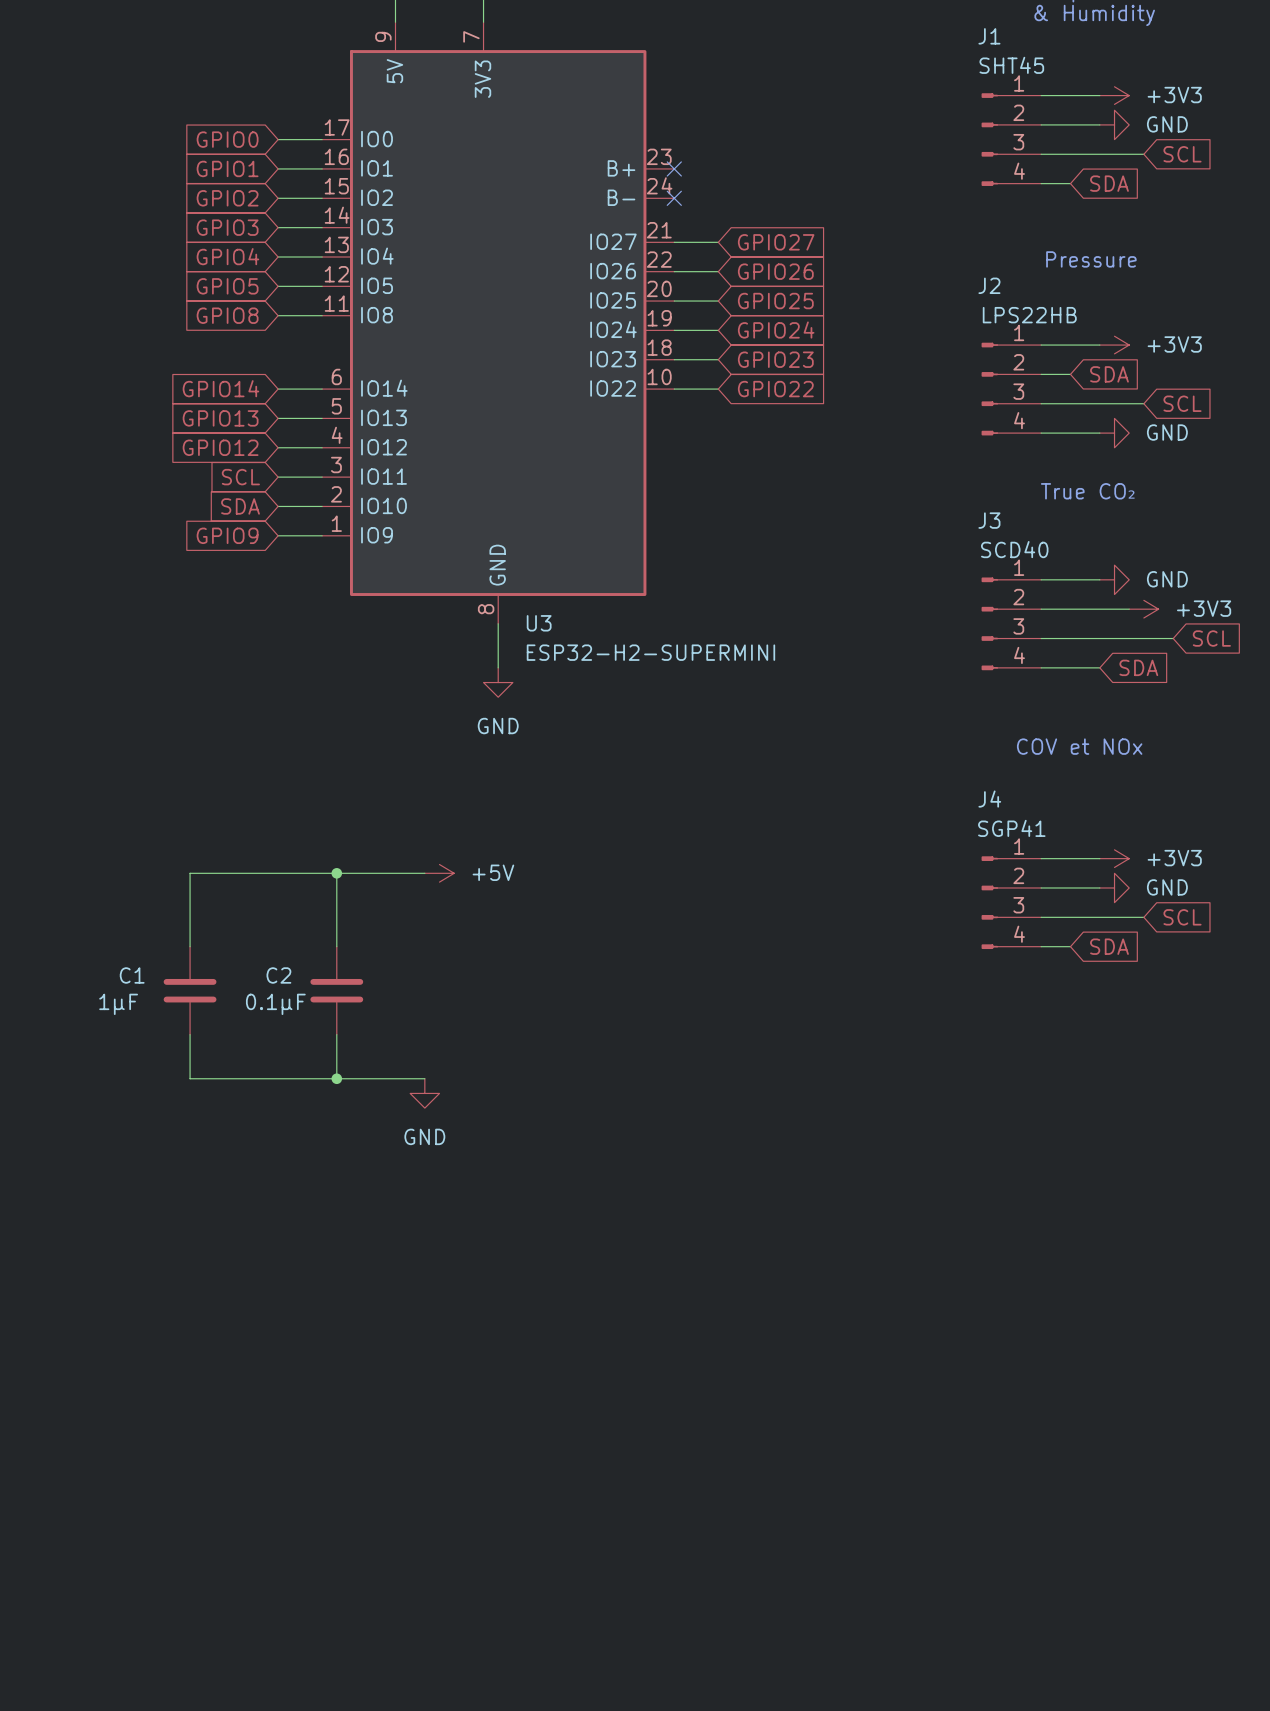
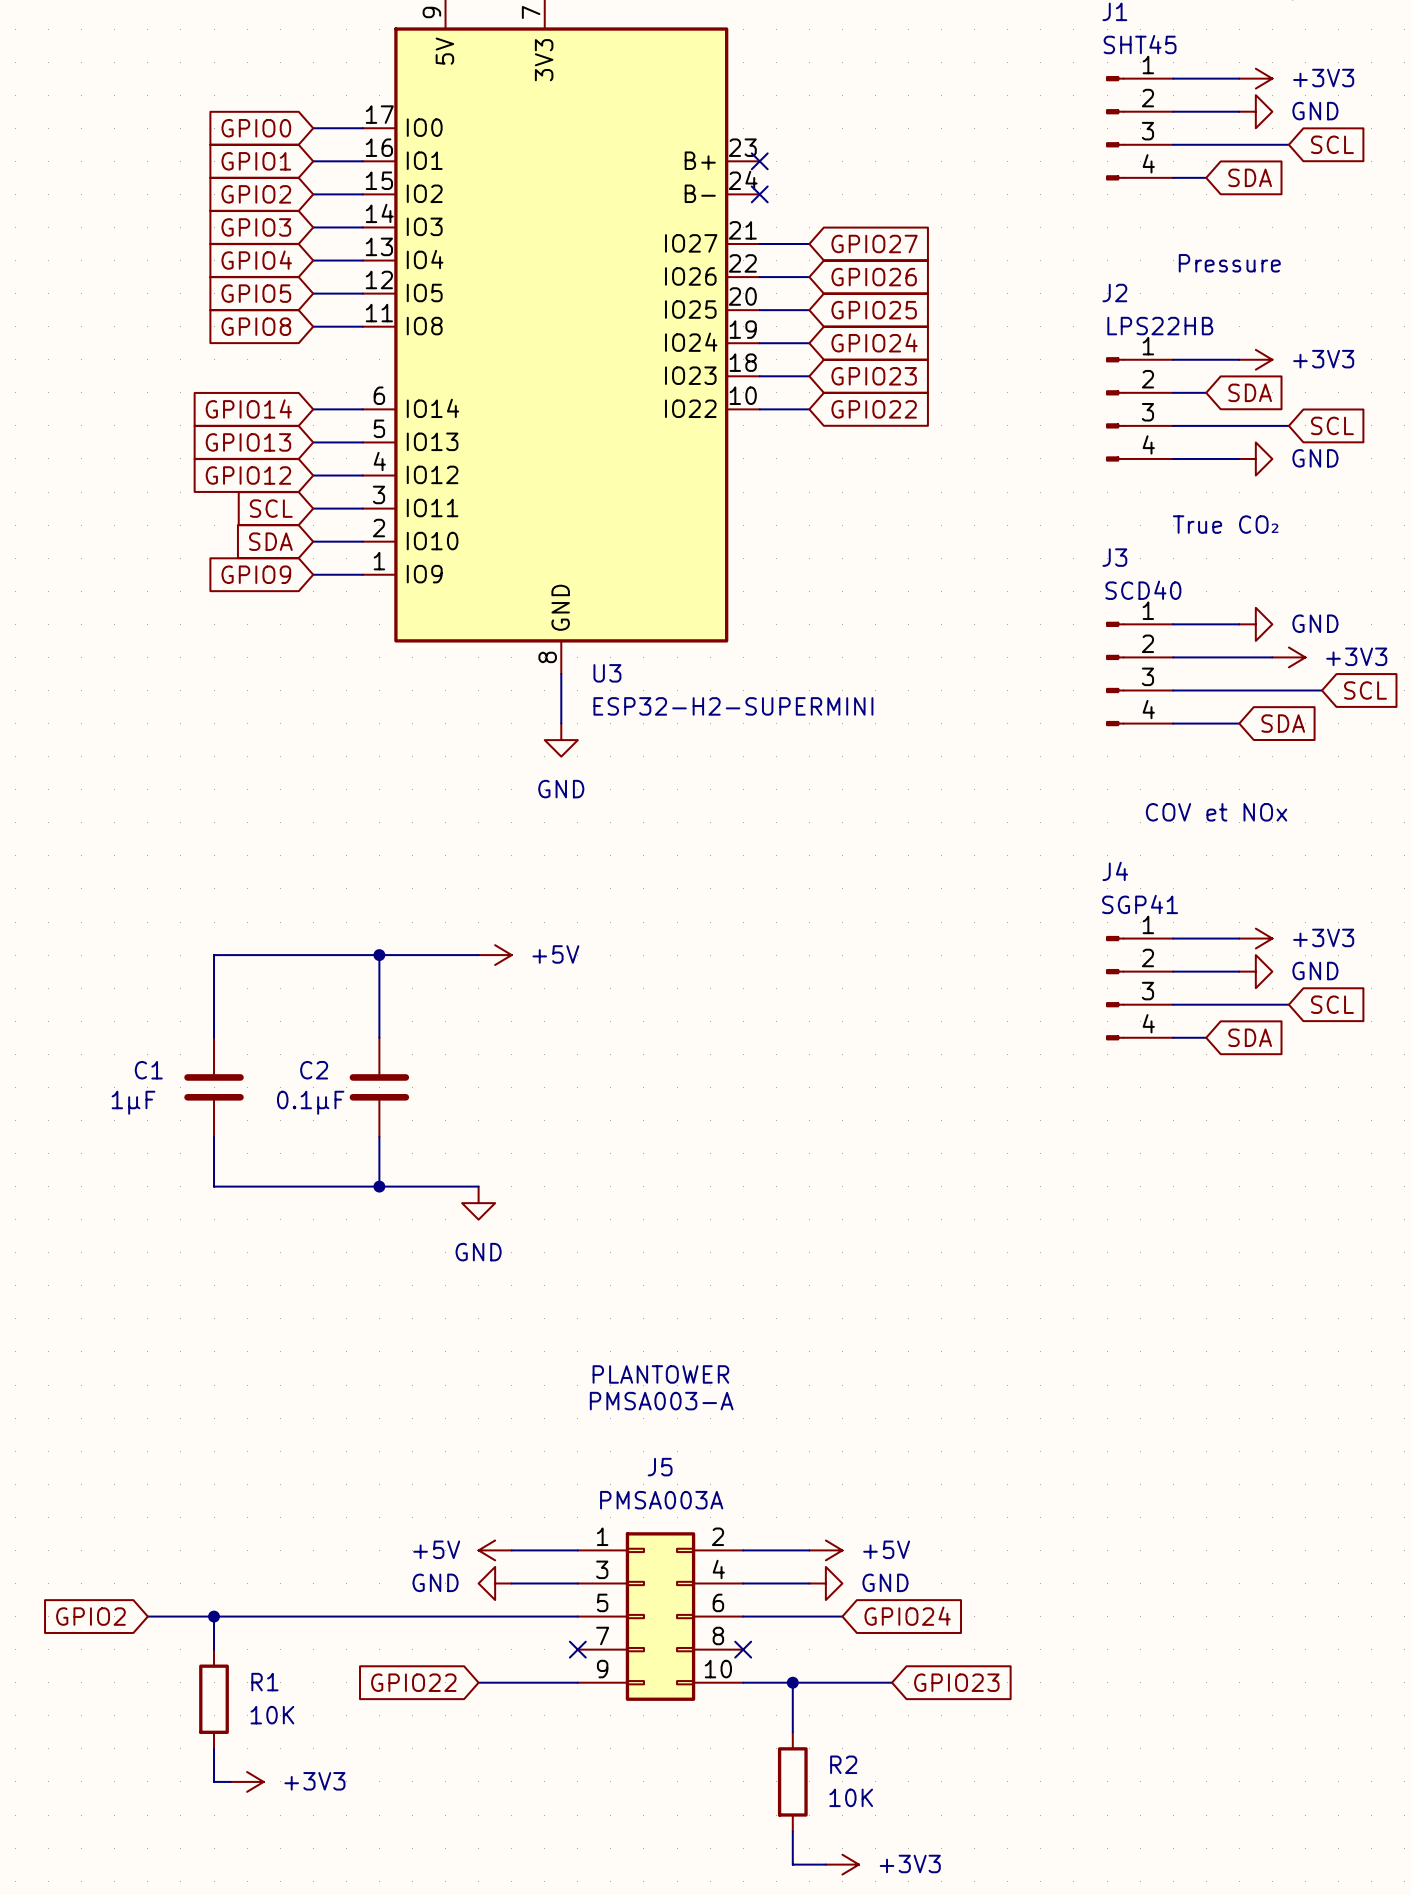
text: none -> PLANTOWER (660, 1374)
text: none -> PMSA003-A (661, 1401)
power symbol: none -> +5V (495, 1550)
wire: none -> (511, 1550) (577, 1550)
wire: none -> (743, 1550) (809, 1550)
power symbol: none -> +5V (825, 1550)
power symbol: none -> GND (495, 1583)
wire: none -> (511, 1583) (577, 1583)
wire: none -> (743, 1583) (809, 1583)
power symbol: none -> GND (825, 1583)
global label: none -> GPIO24 (907, 1616)
global label: none -> GPIO2 (90, 1616)
wire: none -> (147, 1616) (577, 1616)
wire: none -> (214, 1616) (214, 1649)
junction: none -> (214, 1616)
J5: none -> PMSA003A (660, 1616)
wire: none -> (743, 1616) (842, 1616)
no-connect mark: none -> (577, 1649)
no-connect mark: none -> (743, 1649)
global label: none -> GPIO22 (413, 1682)
wire: none -> (478, 1682) (577, 1682)
wire: none -> (743, 1682) (892, 1682)
wire: none -> (792, 1682) (792, 1732)
junction: none -> (792, 1682)
global label: none -> GPIO23 (956, 1682)
R1: none -> 10K (214, 1699)
wire: none -> (214, 1748) (214, 1781) (230, 1781)
power symbol: none -> +3V3 (247, 1781)
R2: none -> 10K (792, 1781)
wire: none -> (792, 1831) (792, 1864) (825, 1864)
power symbol: none -> +3V3 (842, 1864)

